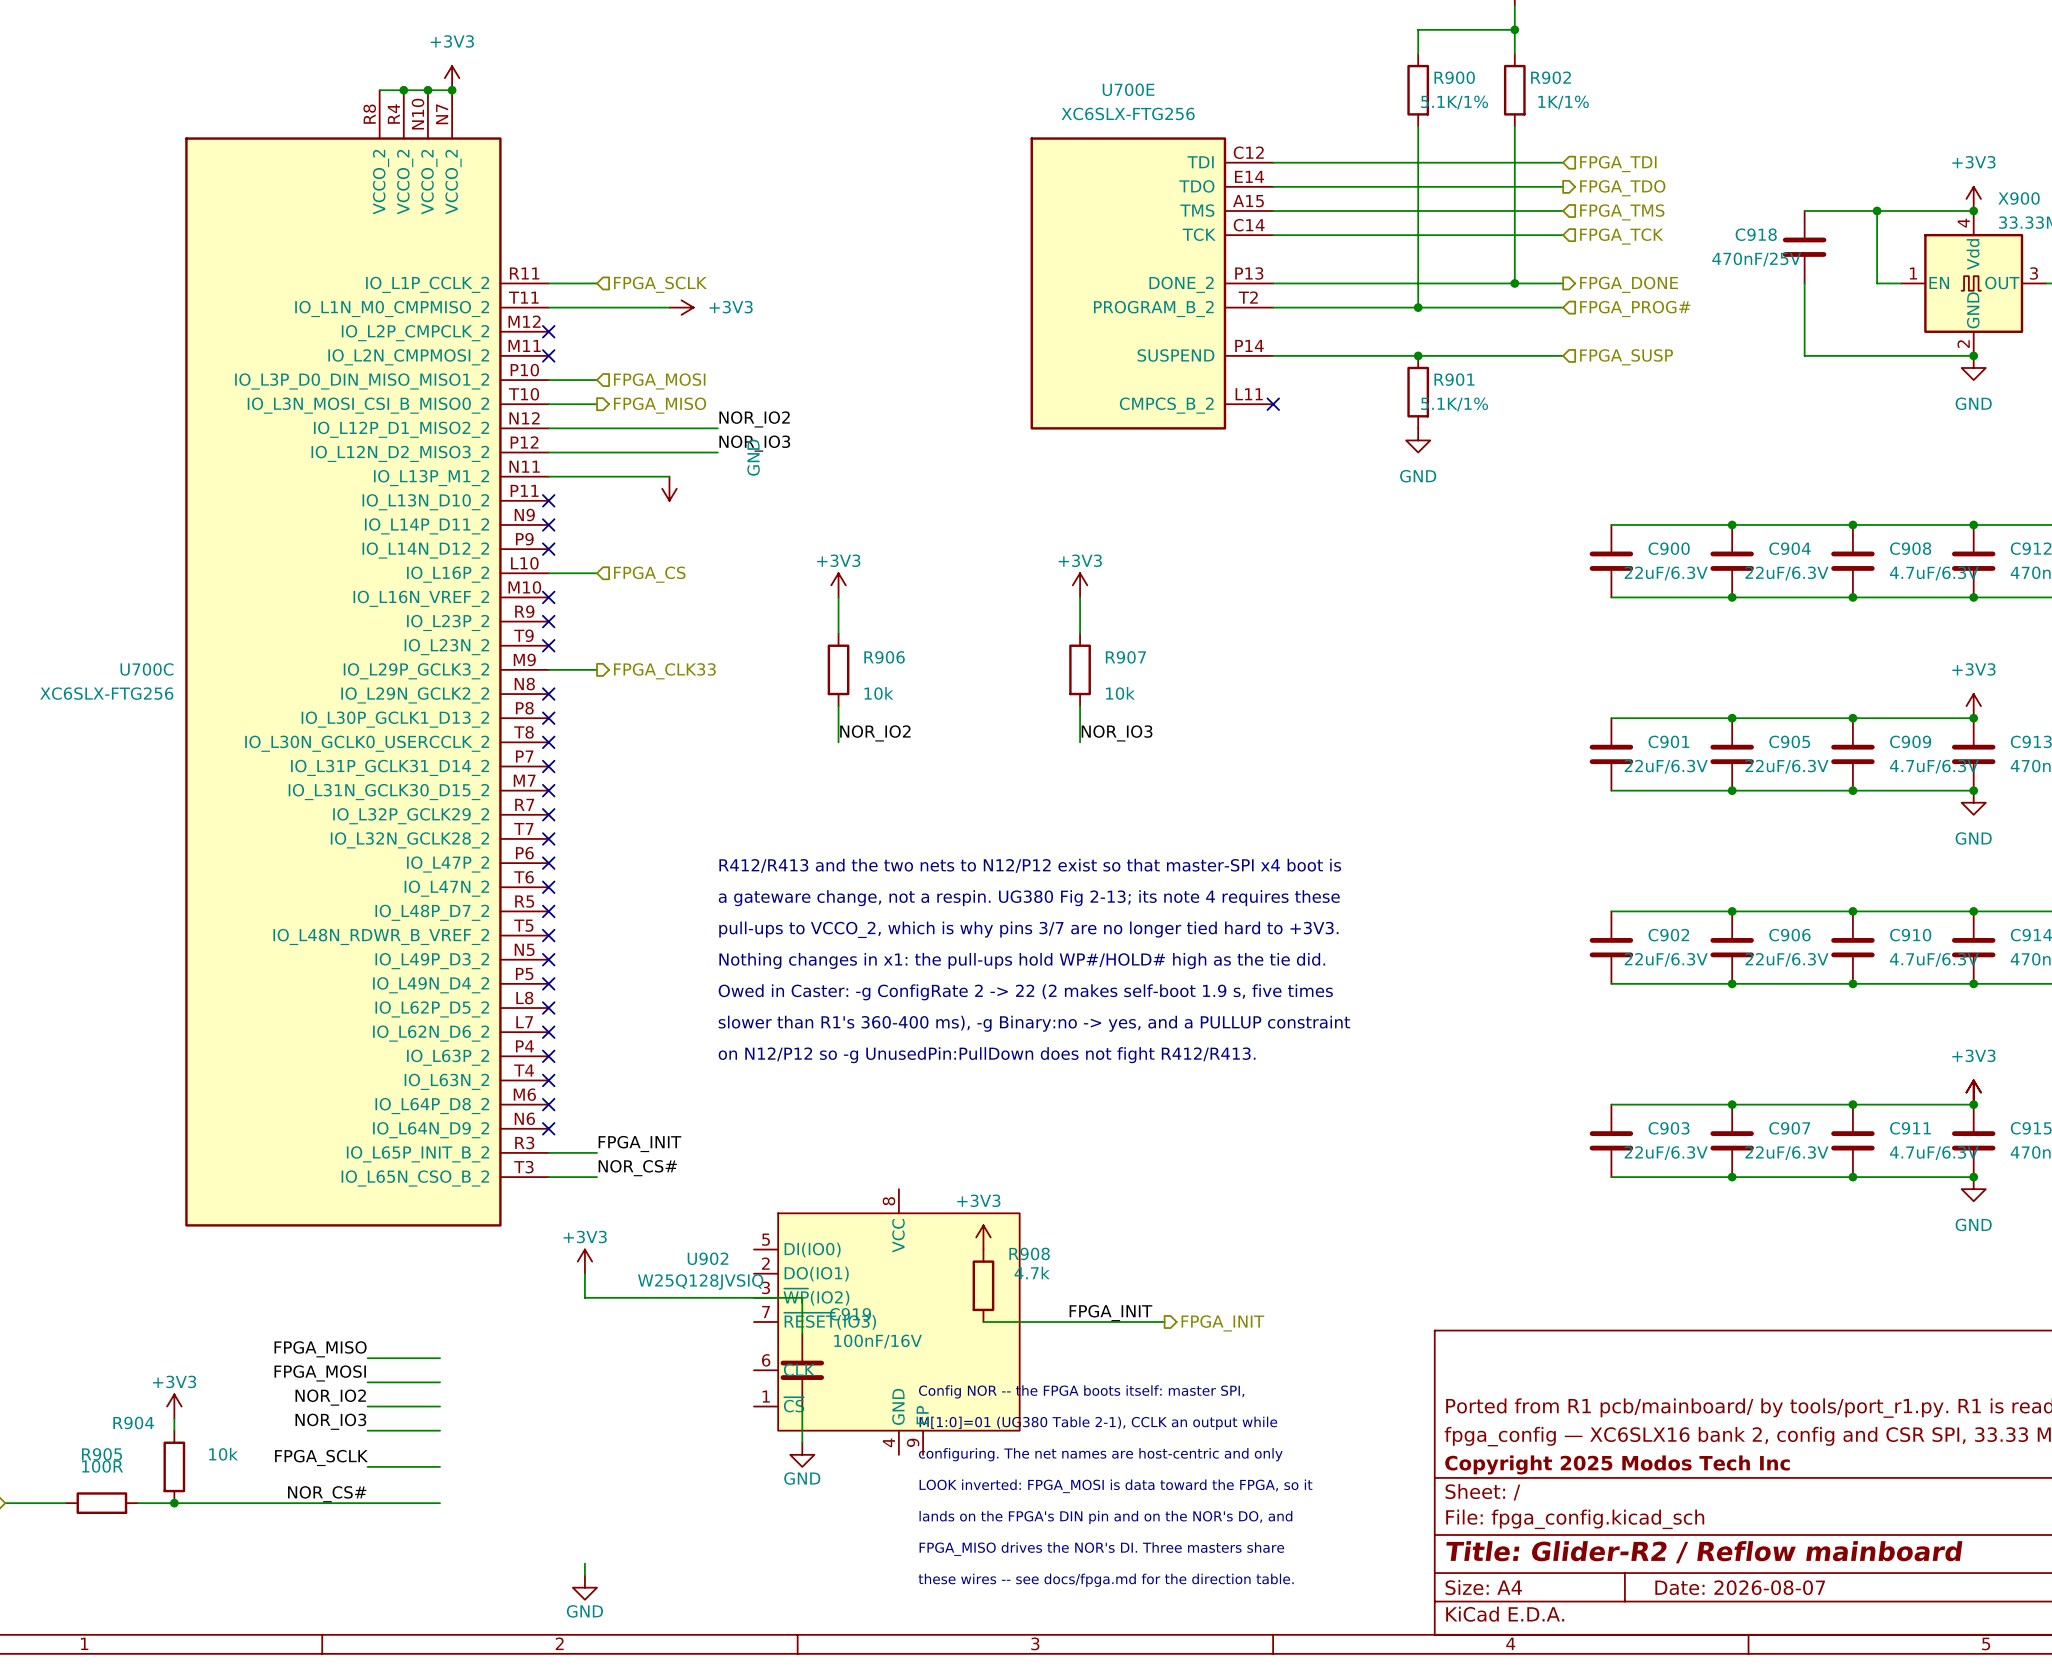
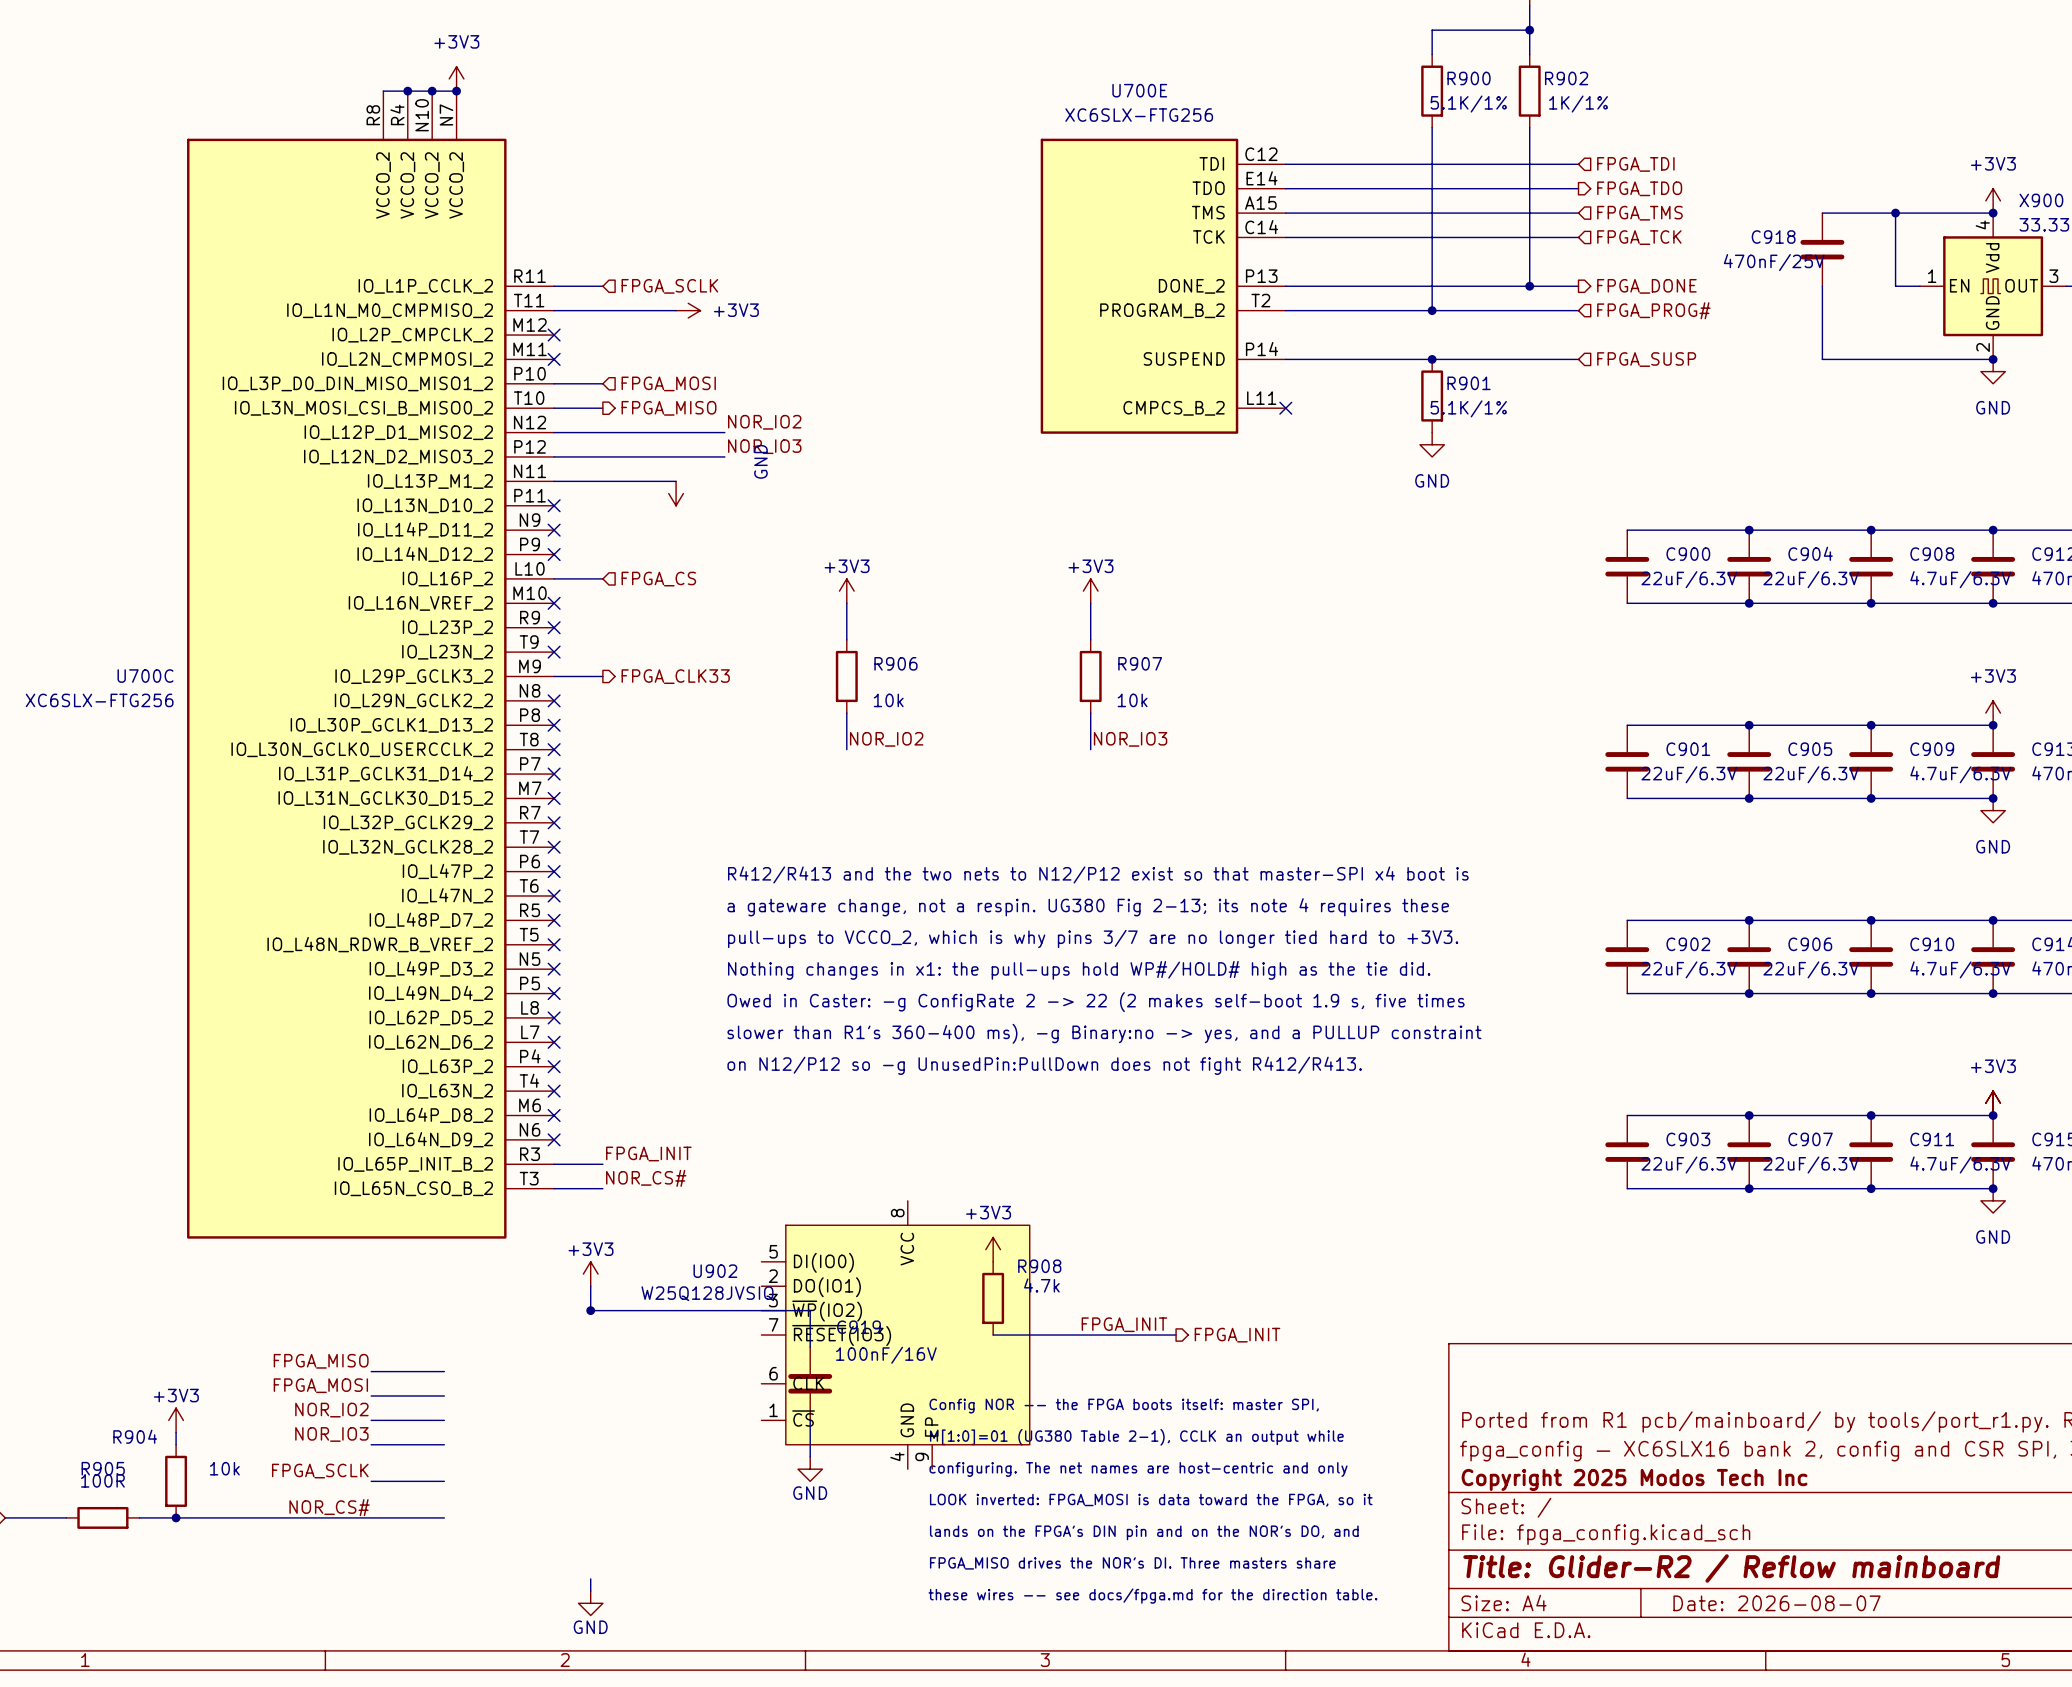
junction: none -> (590, 1310)

